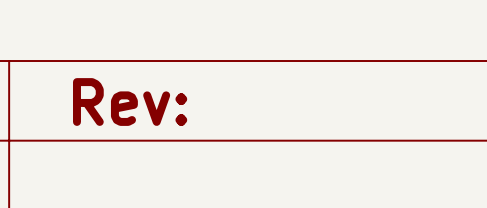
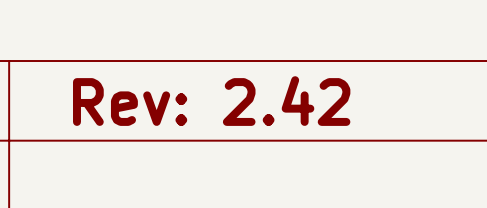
title block: Rev: (130, 102) -> Rev: 2.42 (211, 101)

